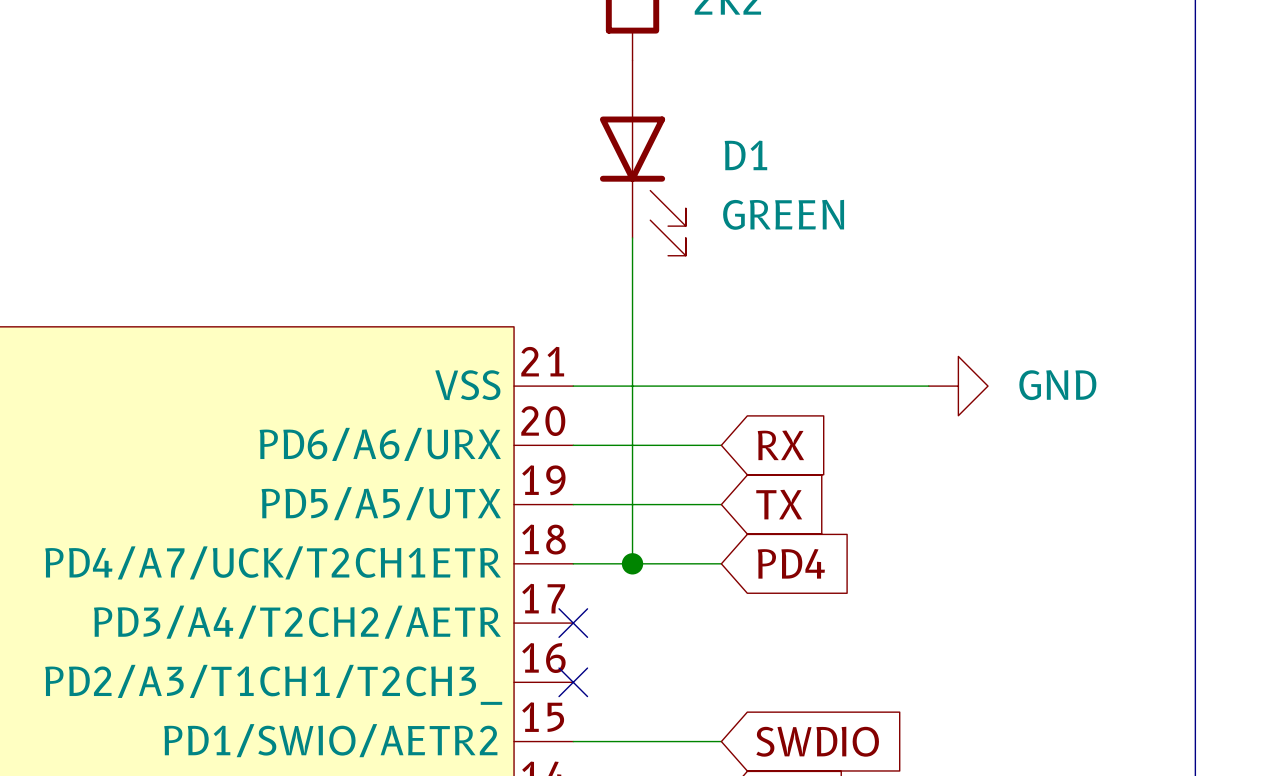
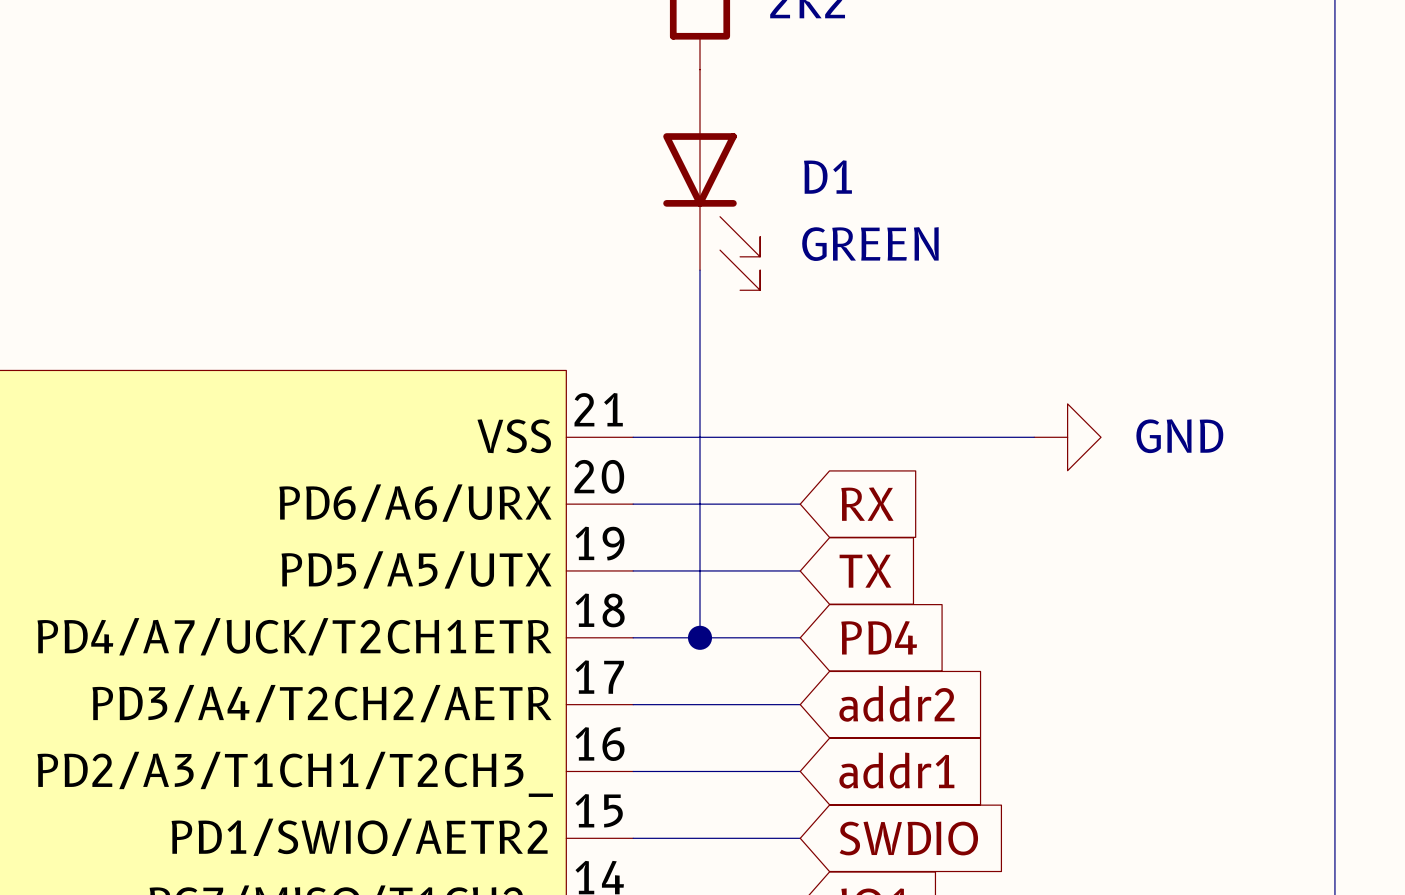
global label: none -> addr2 (896, 703)
wire: none -> (633, 704) (800, 704)
no-connect mark: (573, 623) -> none
global label: none -> addr1 (896, 770)
wire: none -> (633, 771) (800, 771)
no-connect mark: (573, 682) -> none

